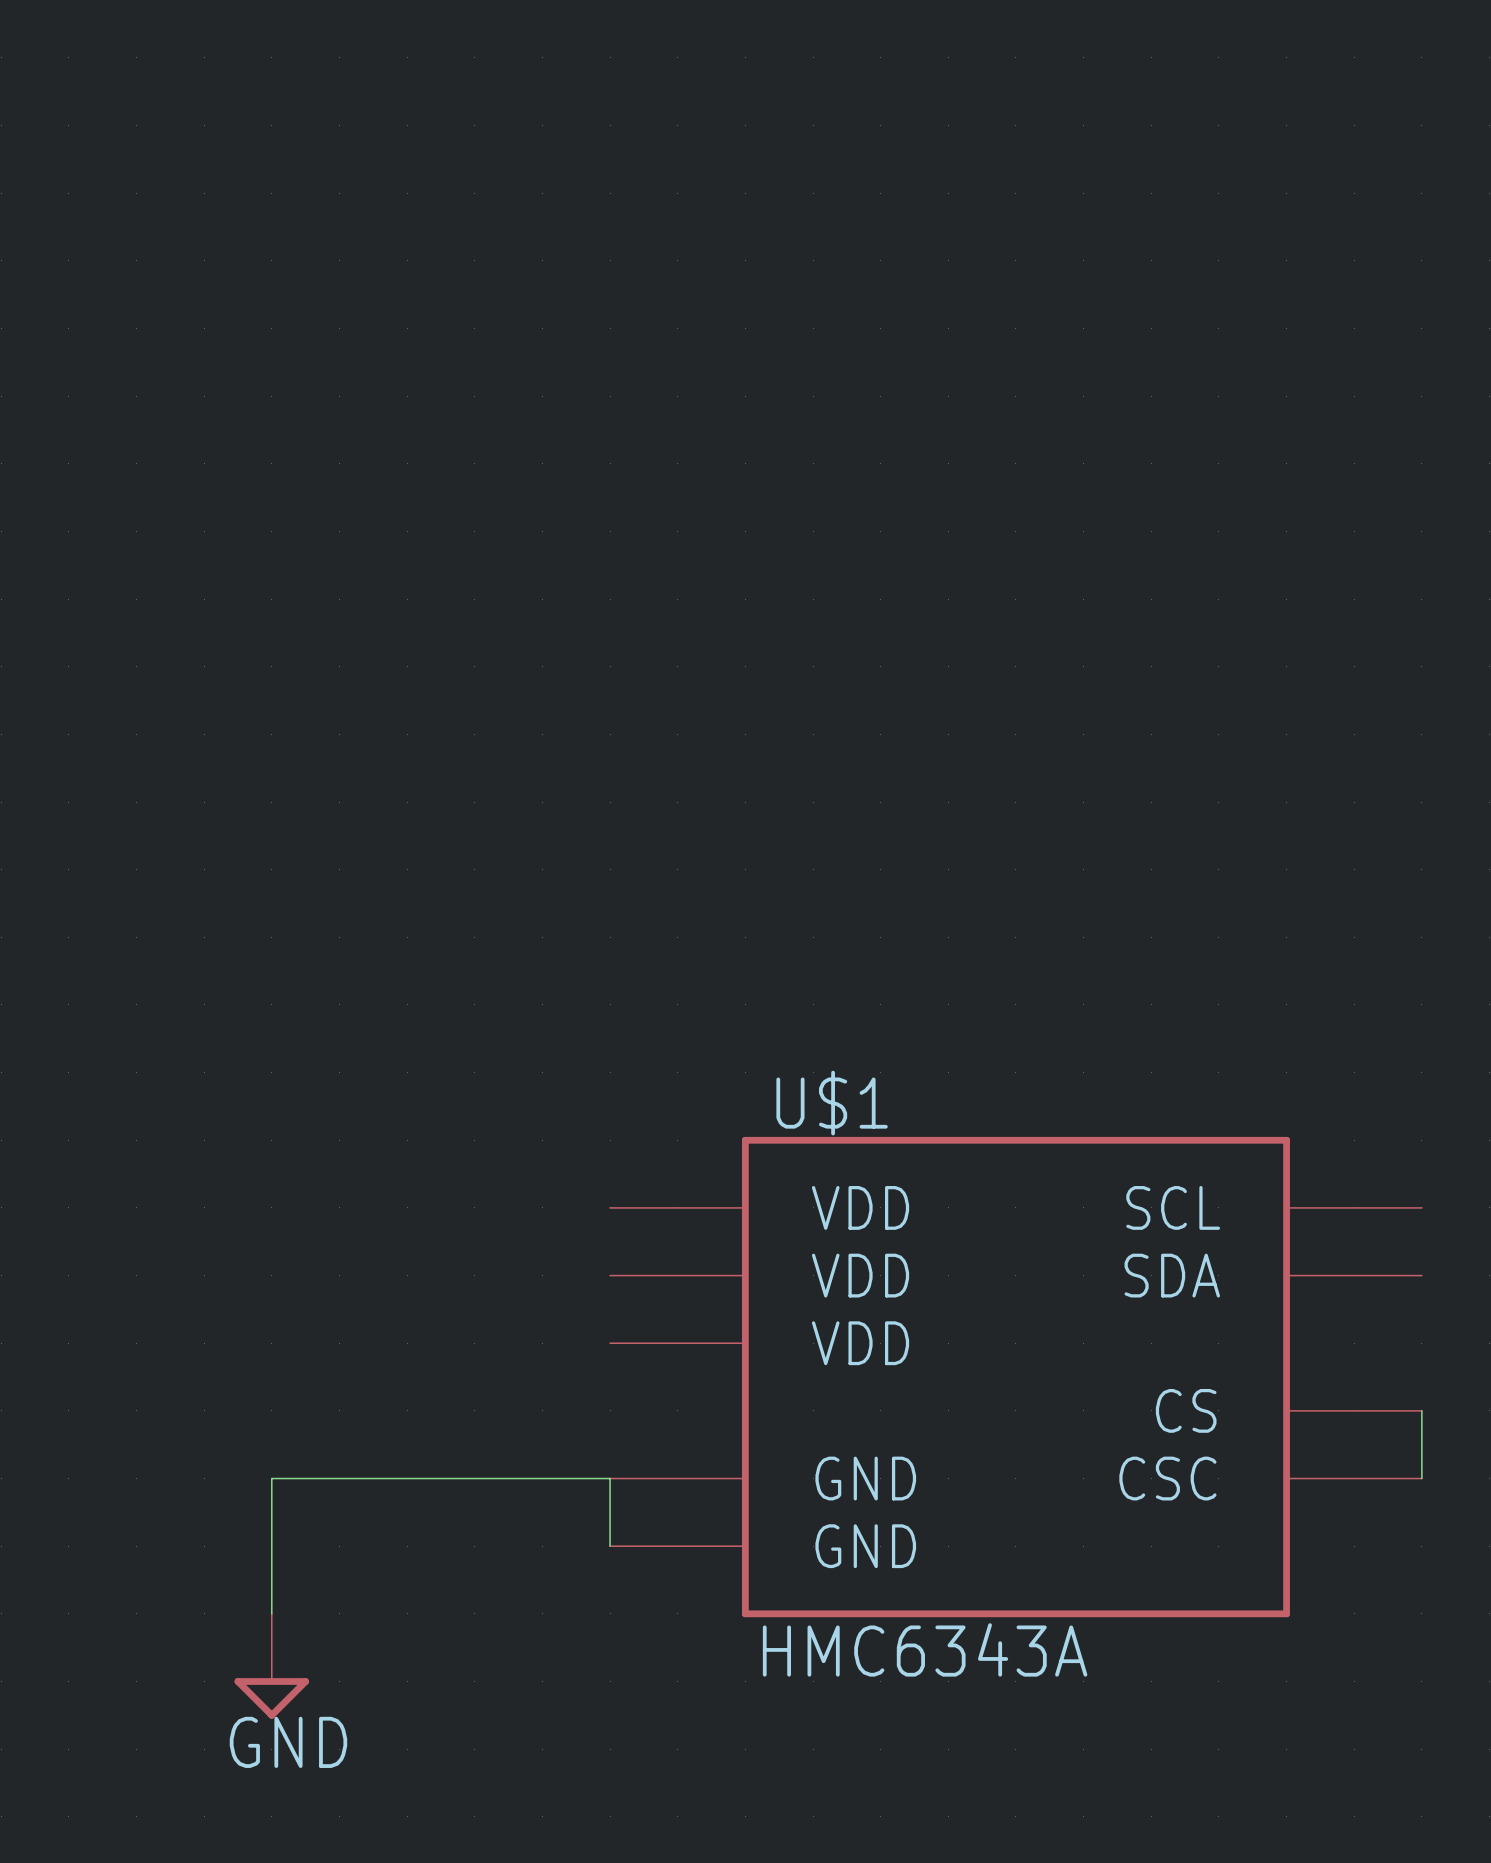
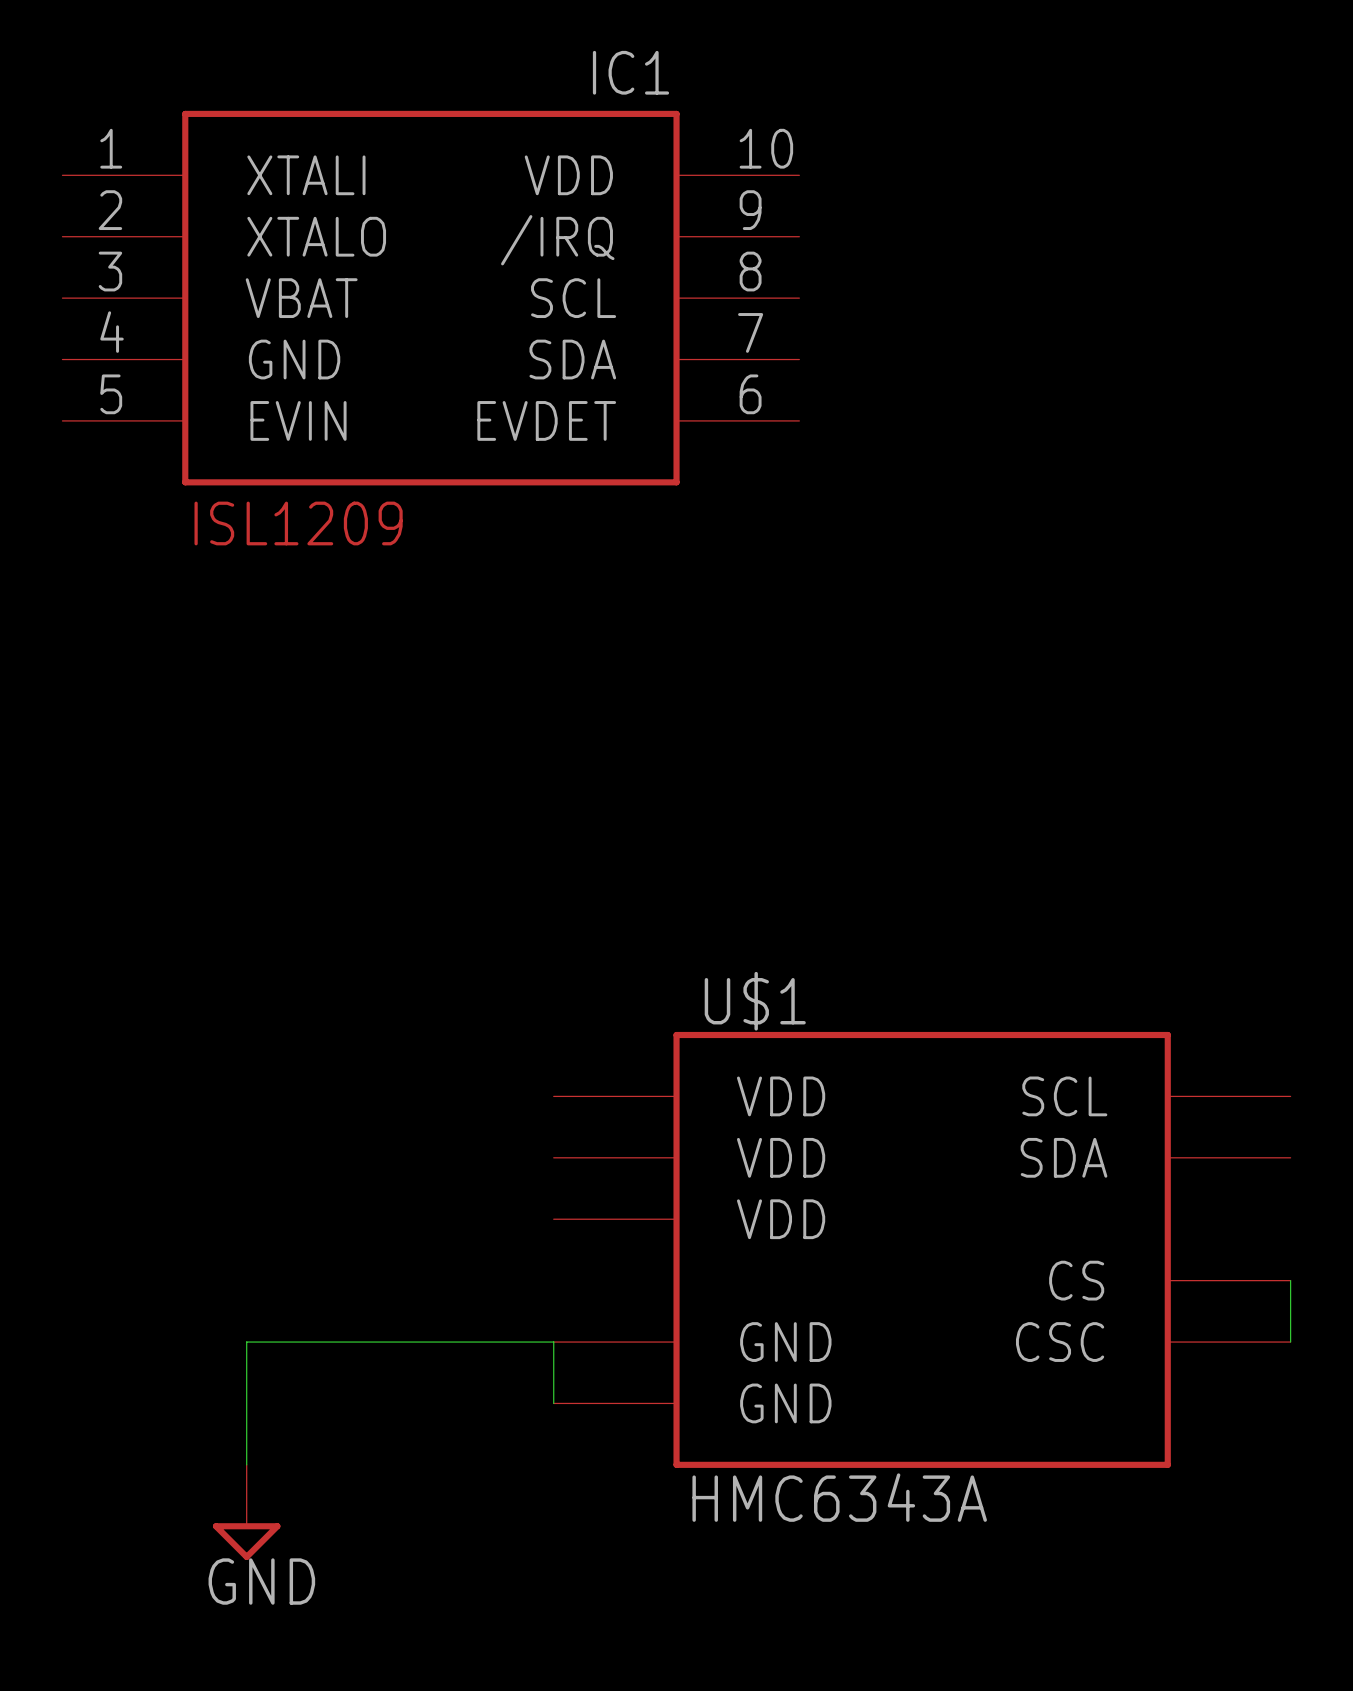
IC1: none -> (430, 298)

